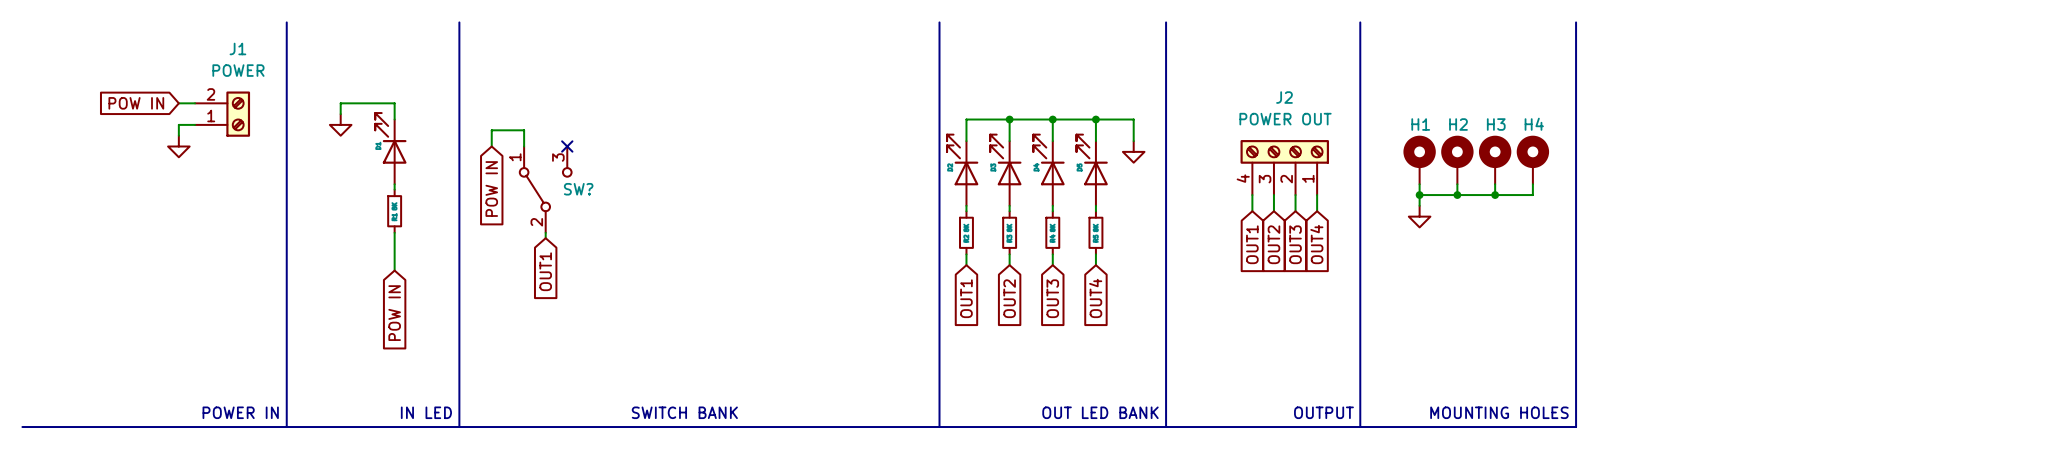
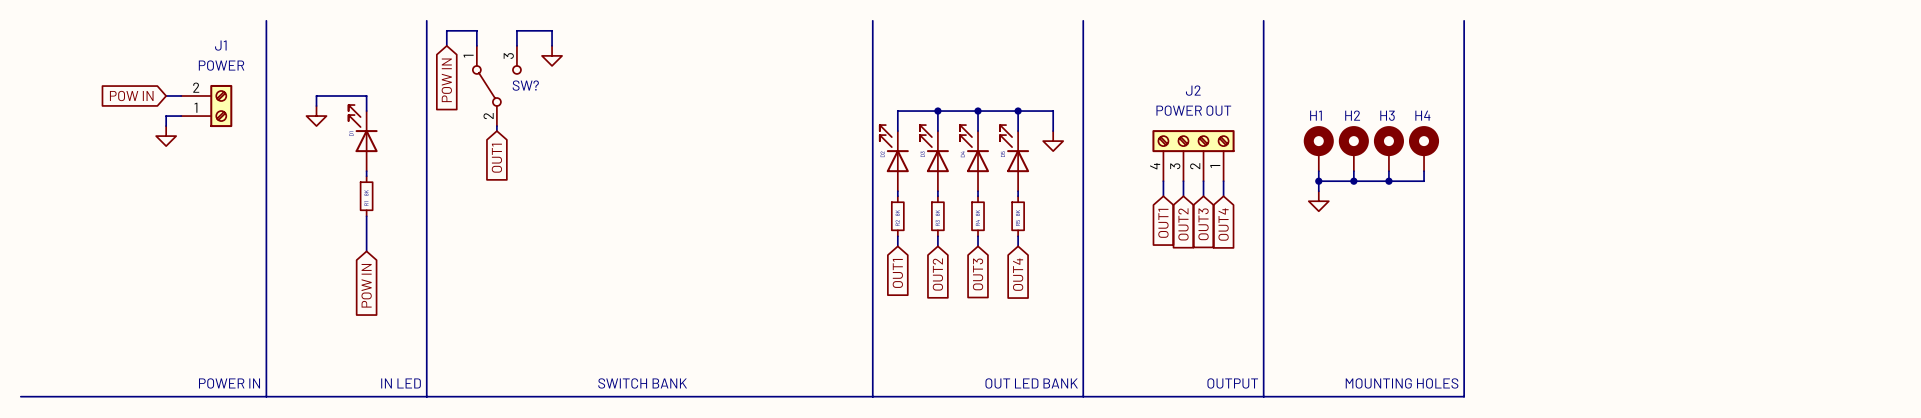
wire: none -> (516, 45) (516, 30) (552, 30) (552, 45)
power symbol: none -> (552, 55)
wire: (491, 146) (491, 130) (524, 130) (524, 146) -> (446, 45) (446, 30) (476, 30) (476, 45)
no-connect mark: (567, 146) -> none
global label position: POW IN (491, 189) -> POW IN (446, 80)
SW? position: (545, 189) -> (496, 85)
wire: (545, 232) (545, 238) -> (496, 126) (496, 131)
global label position: OUT1 (545, 271) -> OUT1 (496, 158)

